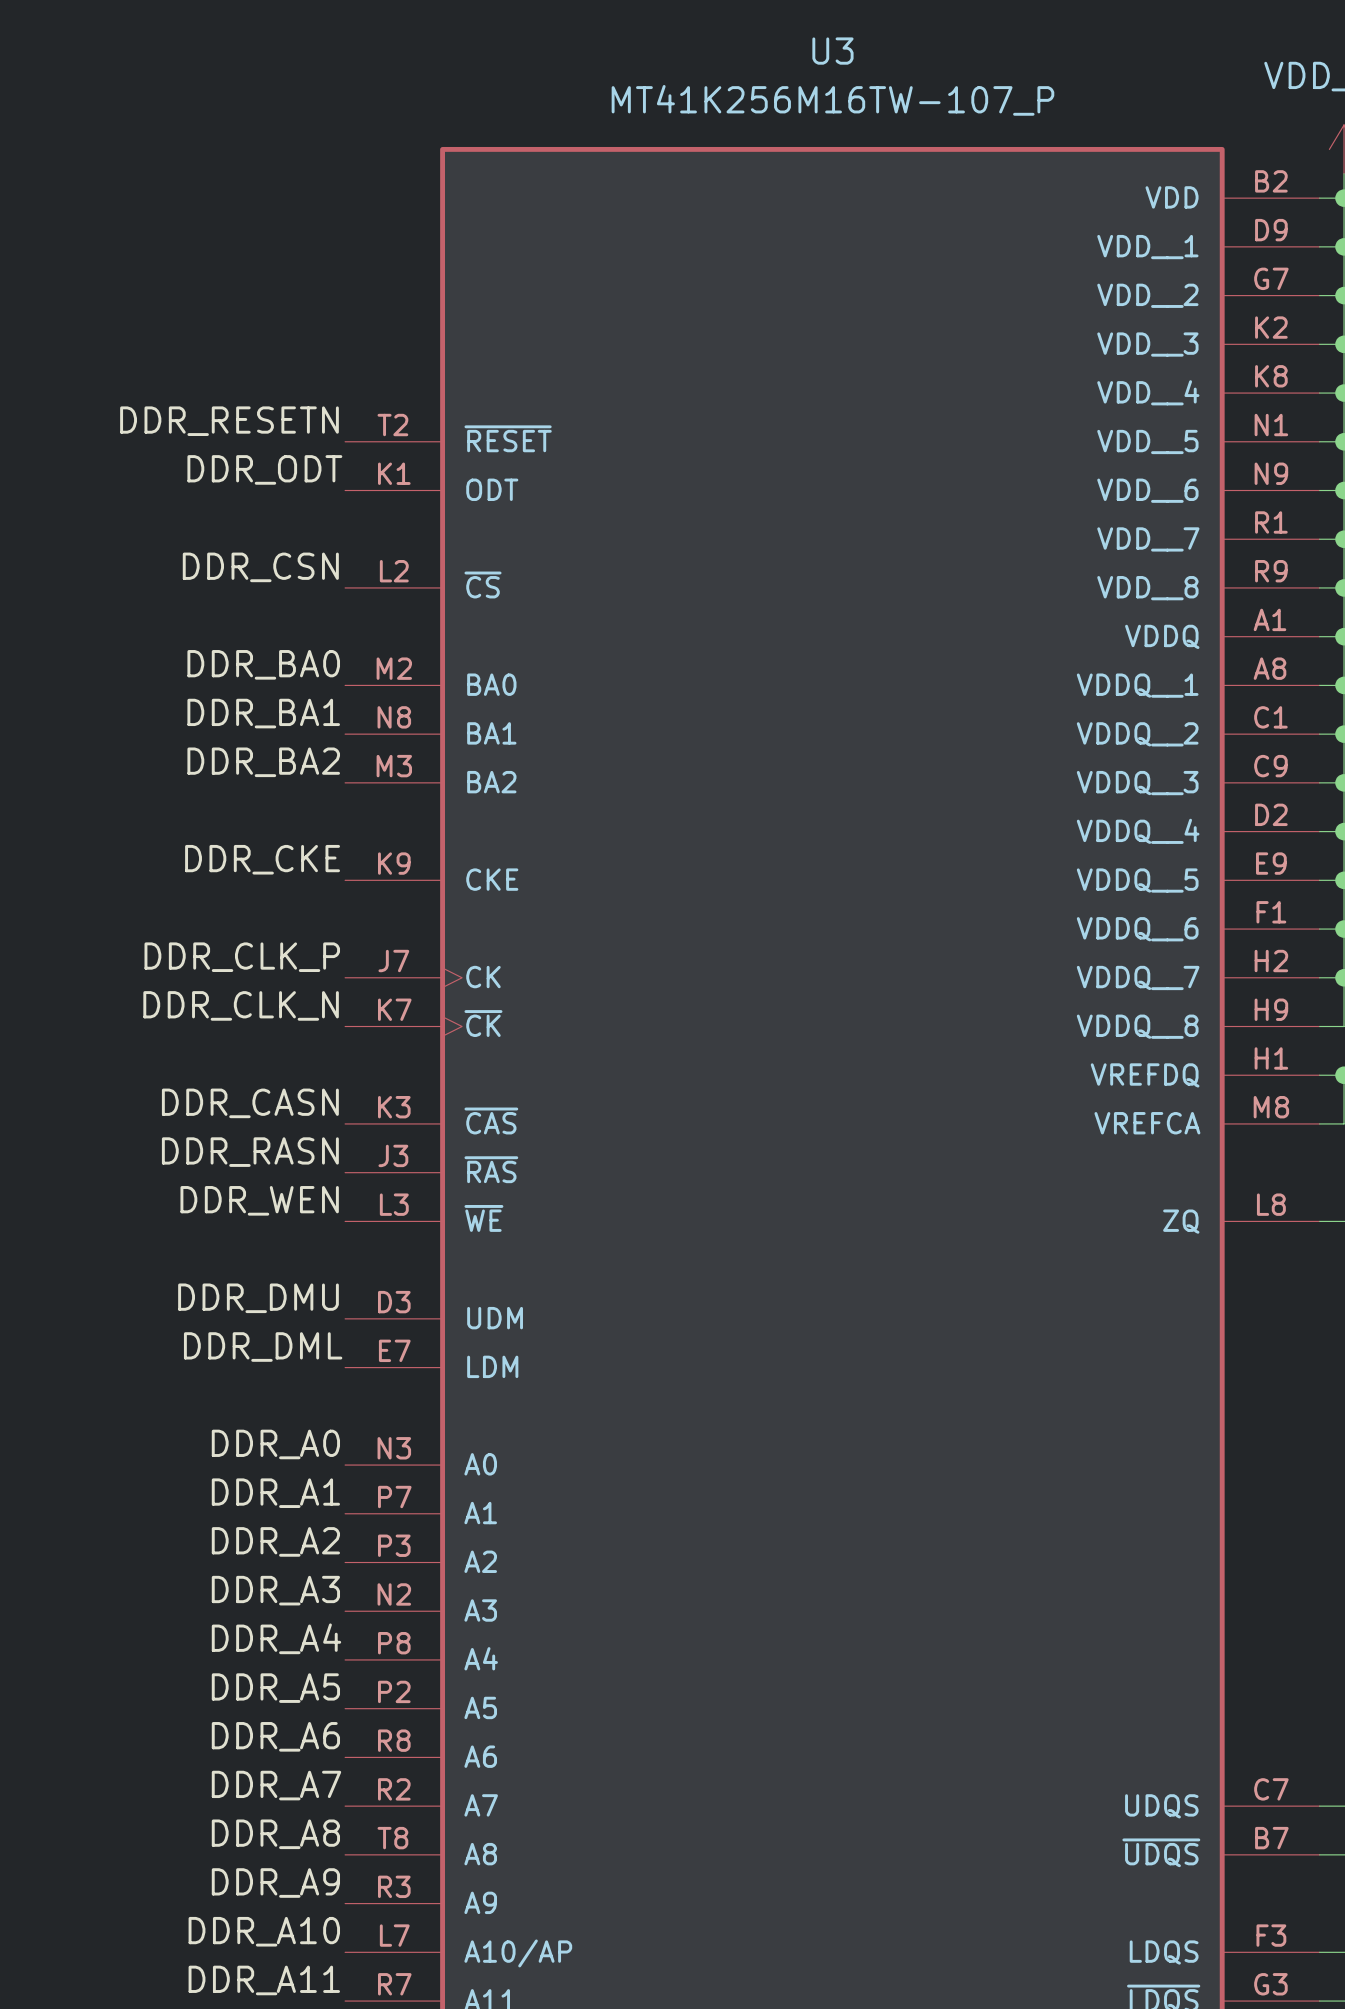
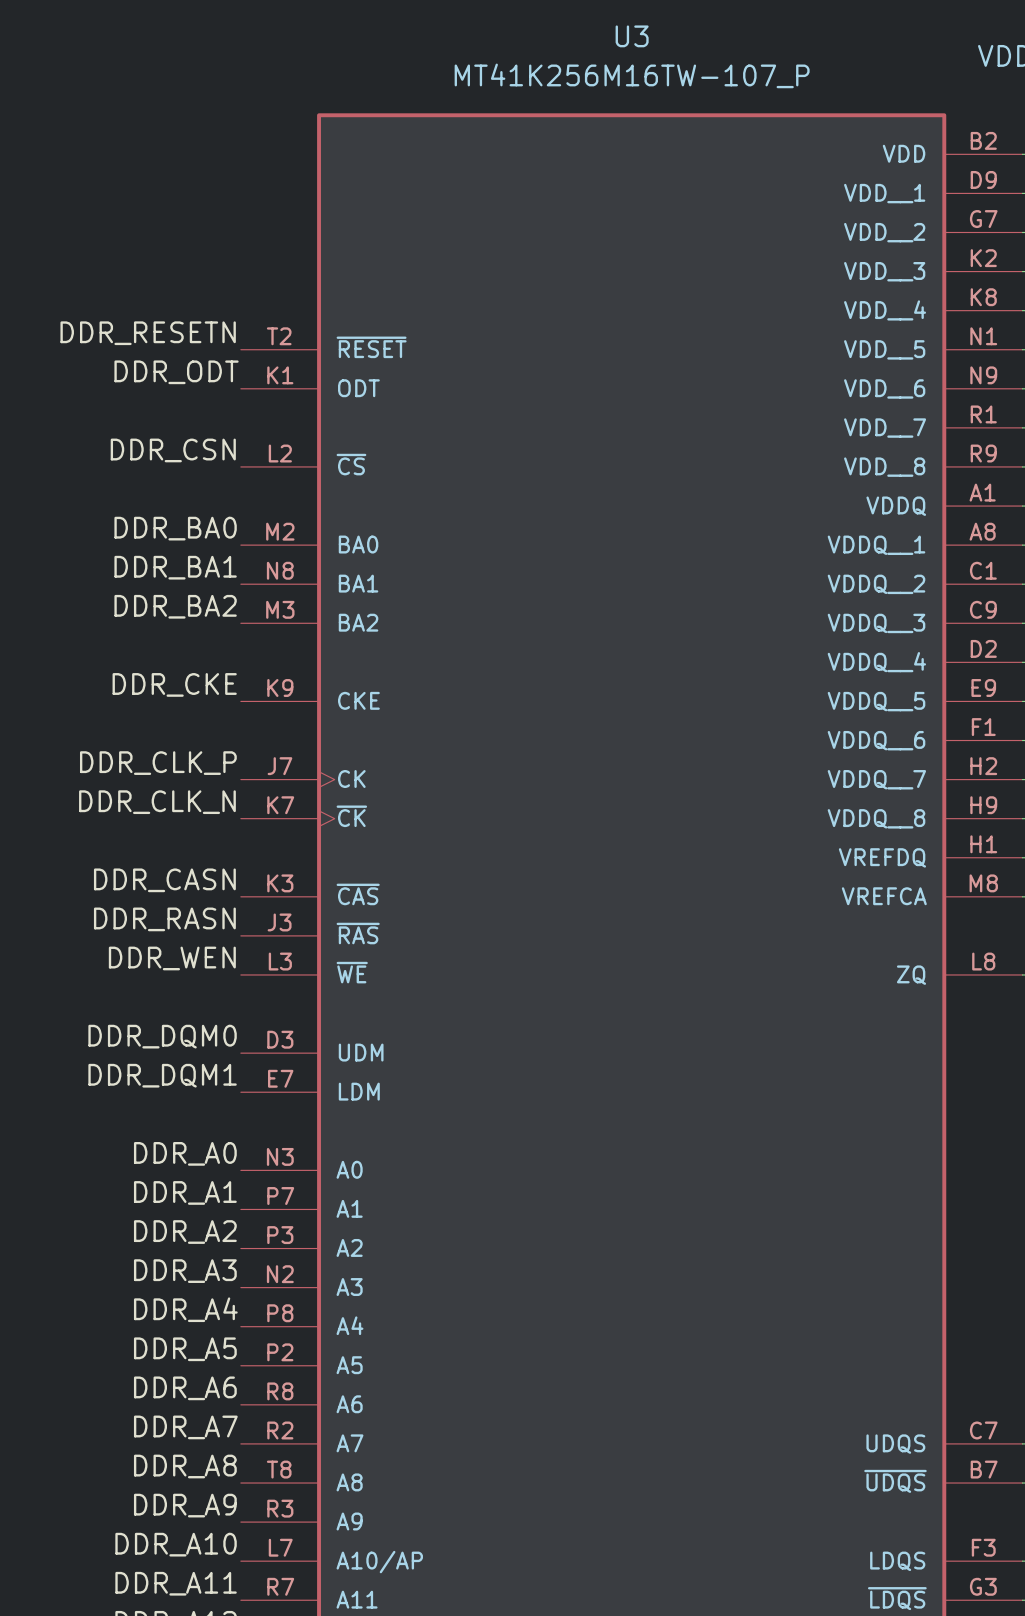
label: DDR_DMU (258, 1298) -> DDR_DQM0 (162, 1036)
label: DDR_DML (263, 1347) -> DDR_DQM1 (162, 1075)

